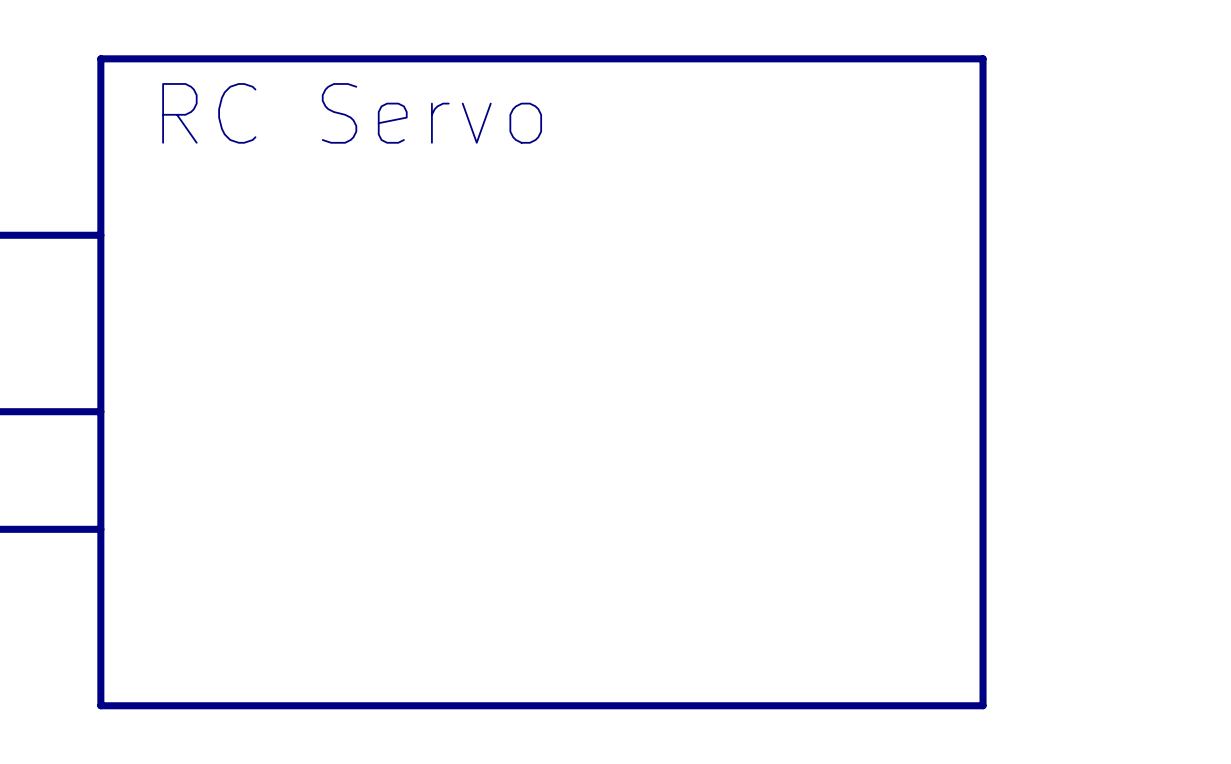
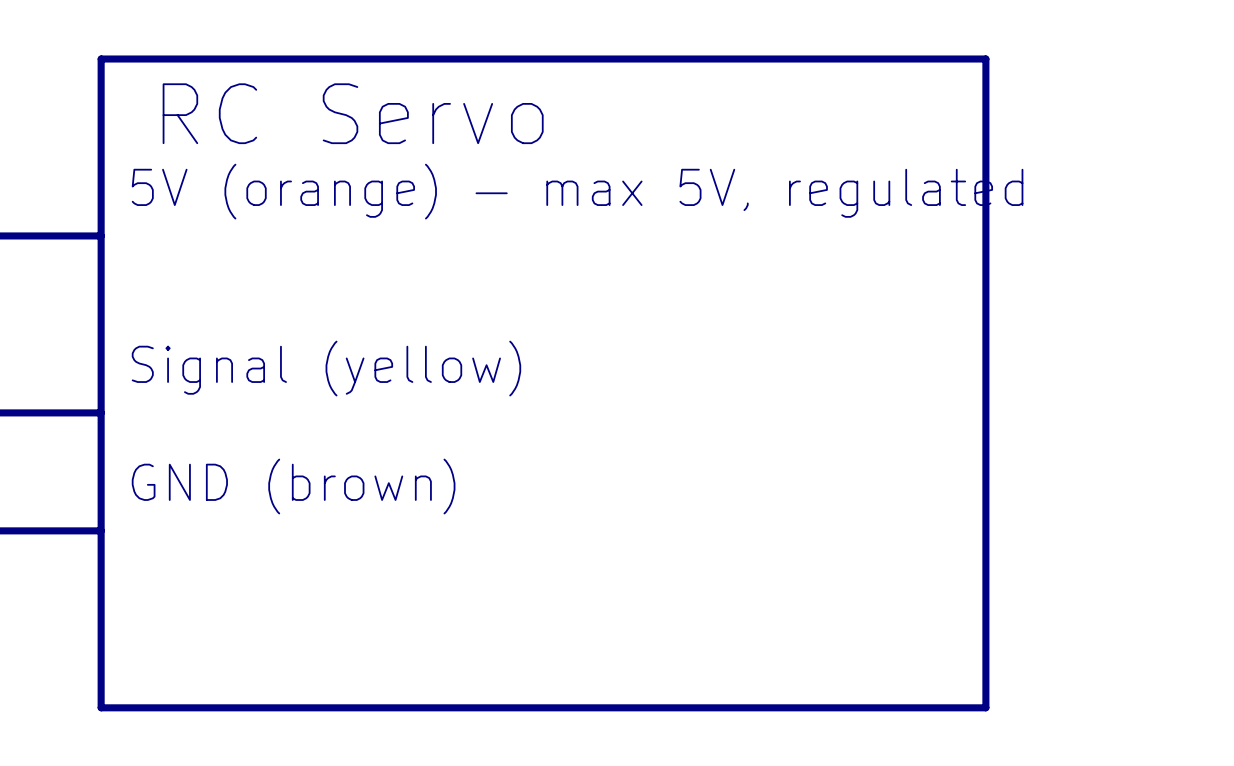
text: none -> 5V (orange) — max 5V, regulated (577, 191)
text: none -> Signal (yellow) (326, 368)
text: none -> GND (brown) (293, 486)

